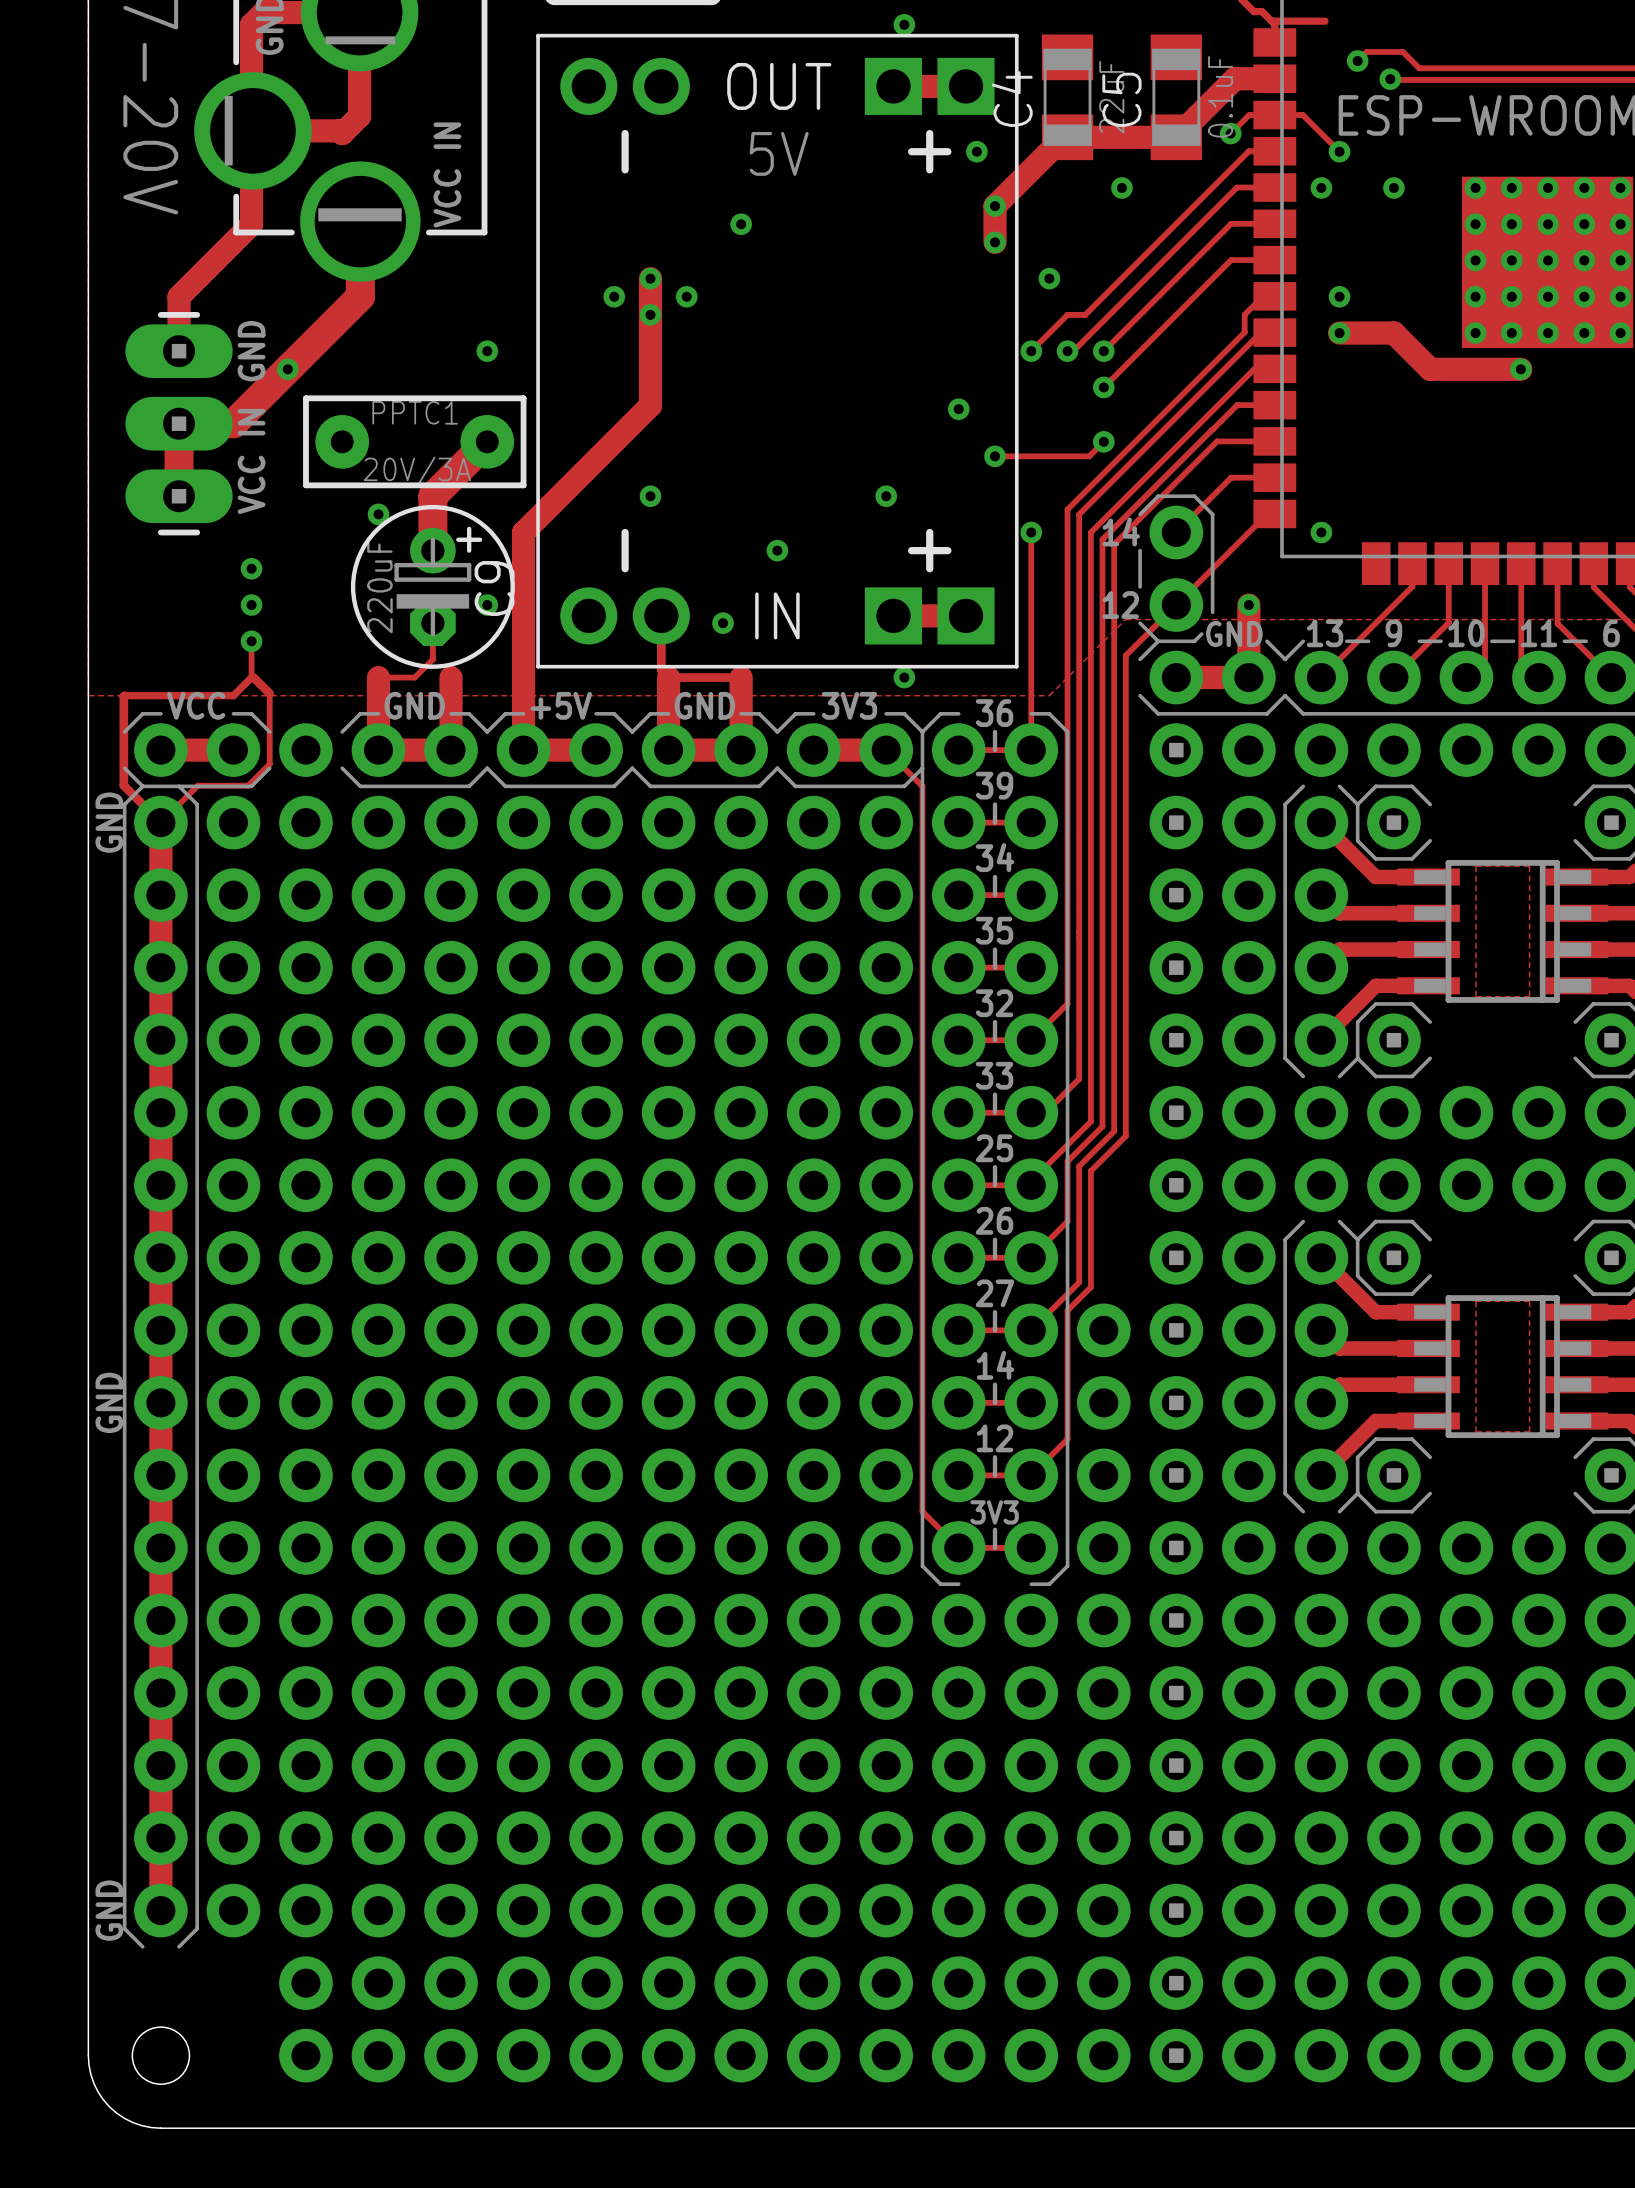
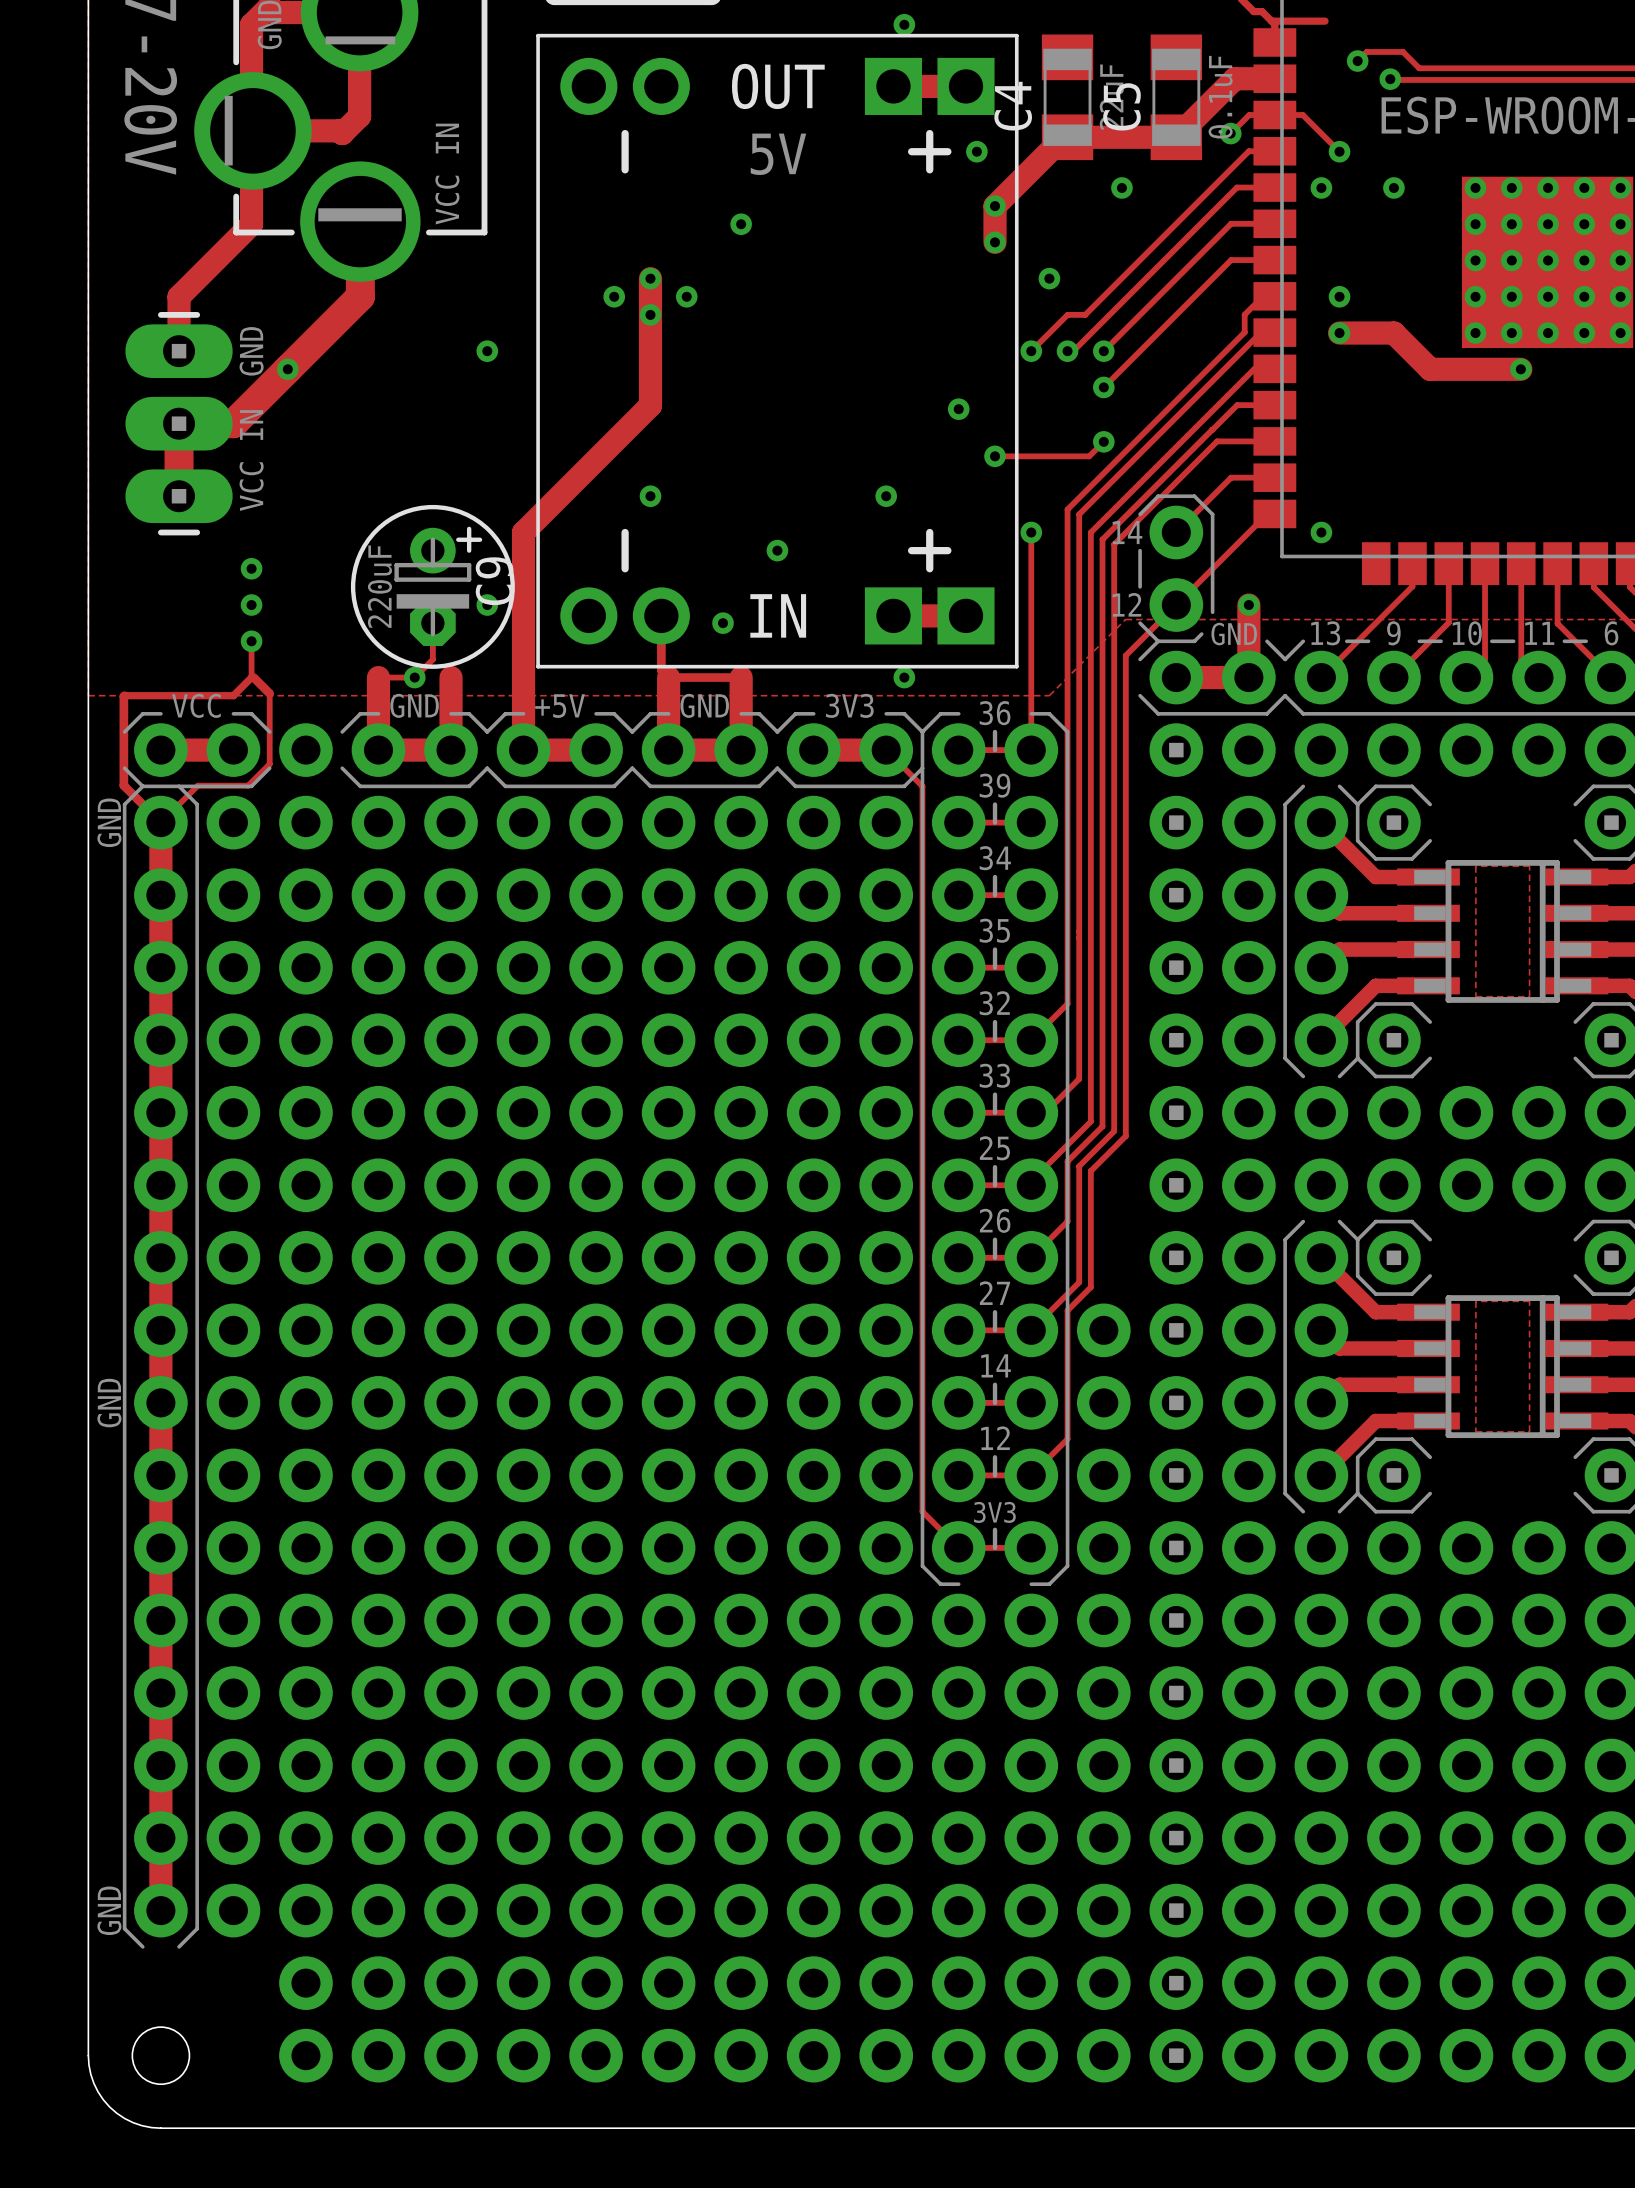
text: PPTC1 (415, 412) -> none
part: (414, 441) -> none
track: (487, 441) (432, 496) (432, 550) -> none
text: 20V/3A (417, 471) -> none
via position: (378, 514) -> (414, 677)

